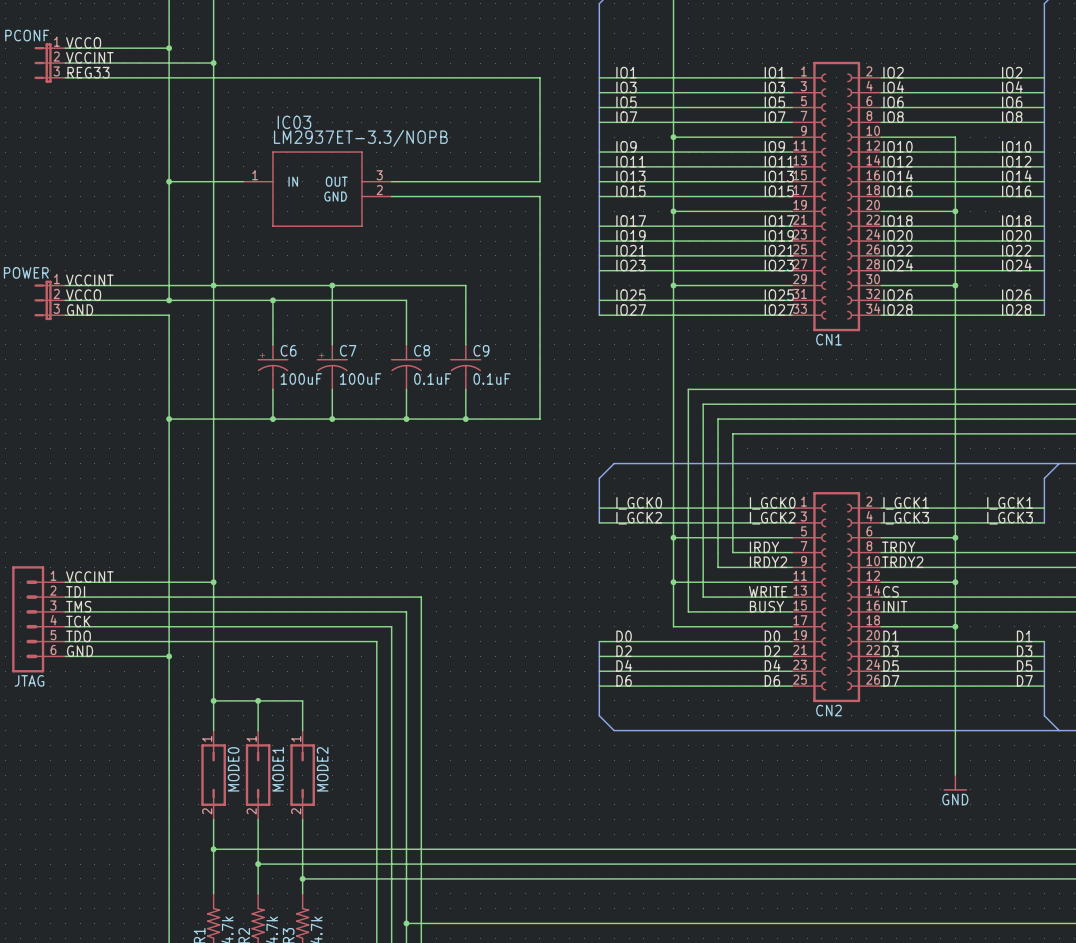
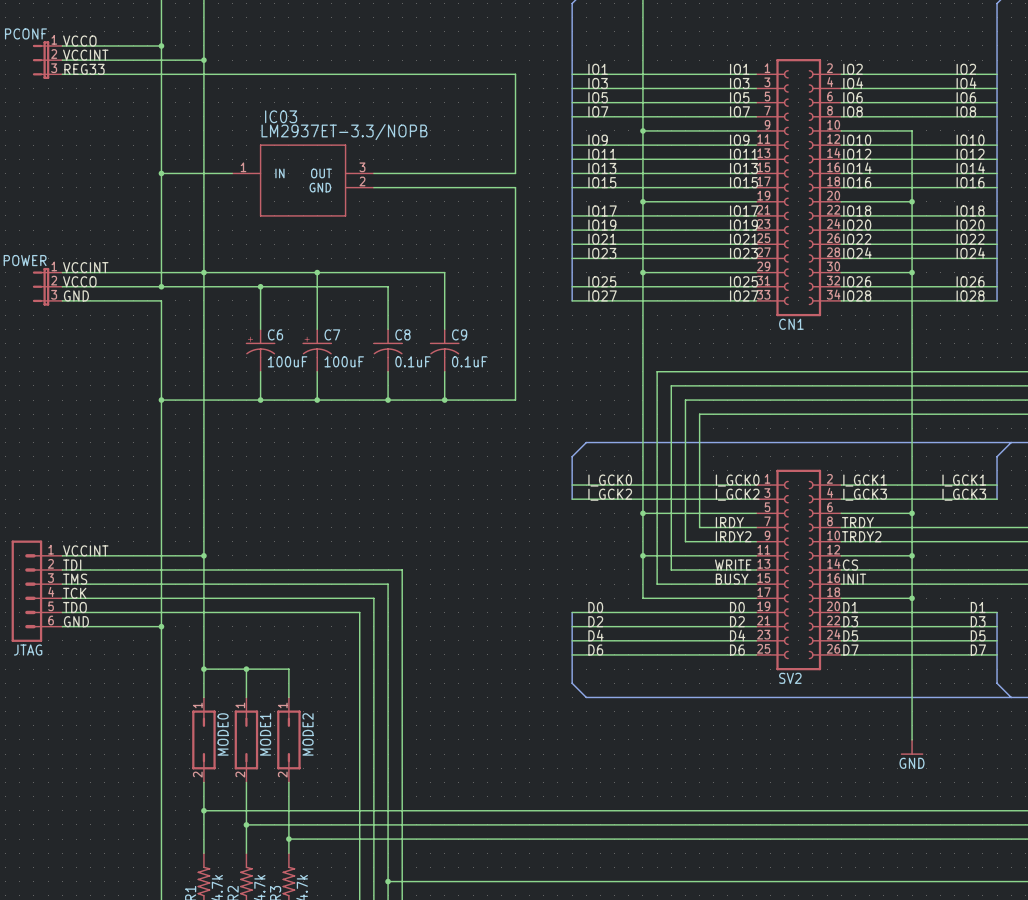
CN2 name: CN2 (829, 710) -> SV2 (790, 678)

